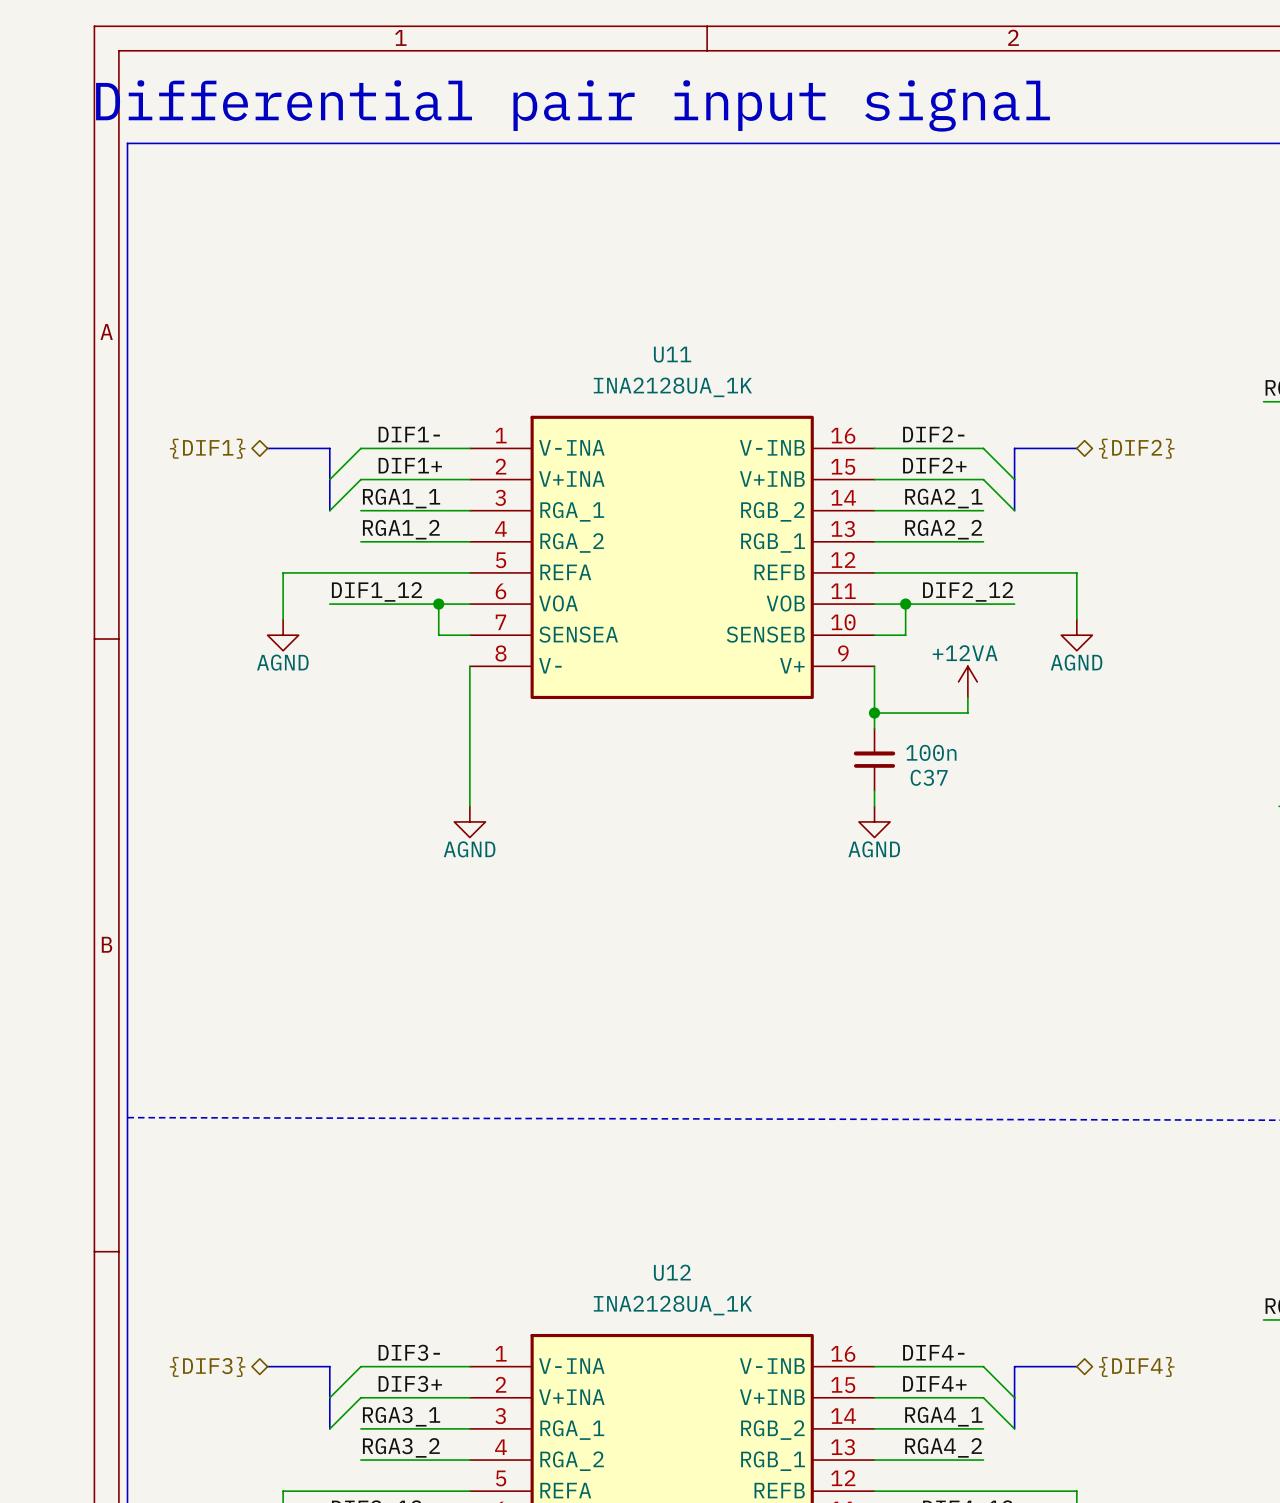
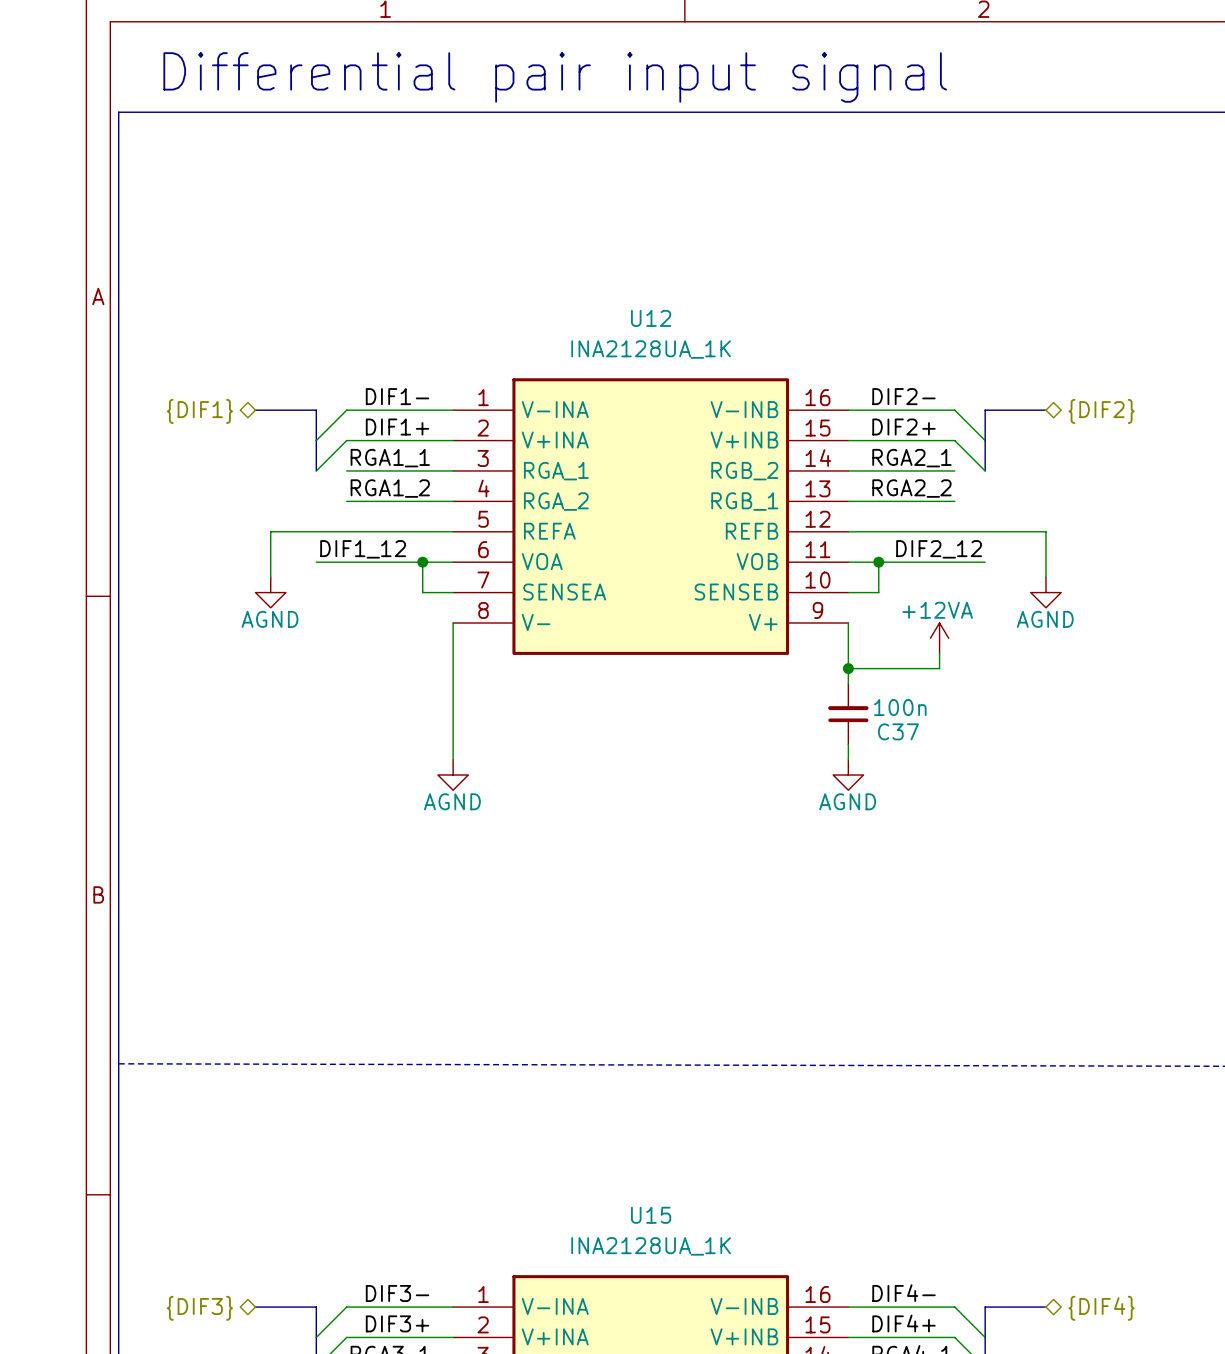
U11 name: U11 (672, 354) -> U12 (651, 318)
U12 name: U12 (672, 1272) -> U15 (651, 1215)

